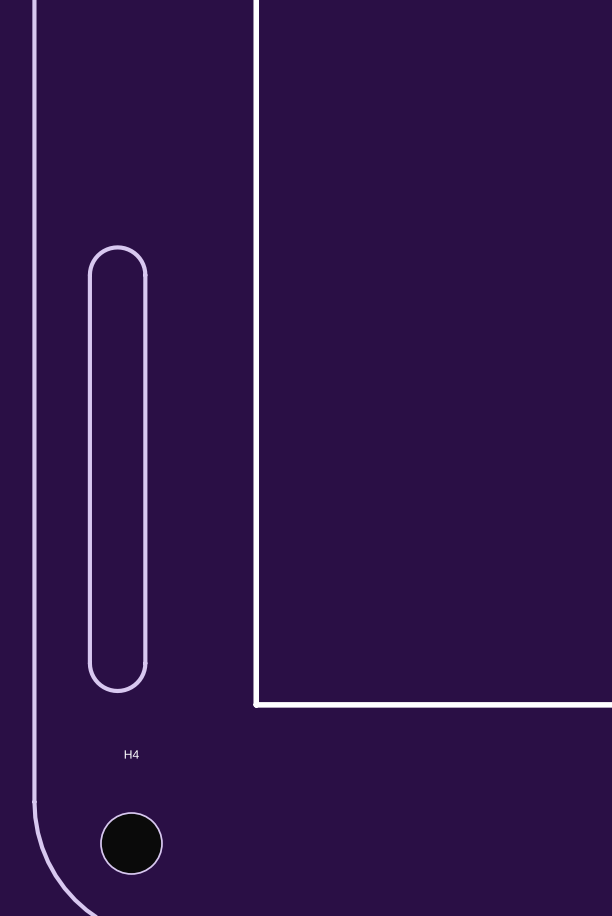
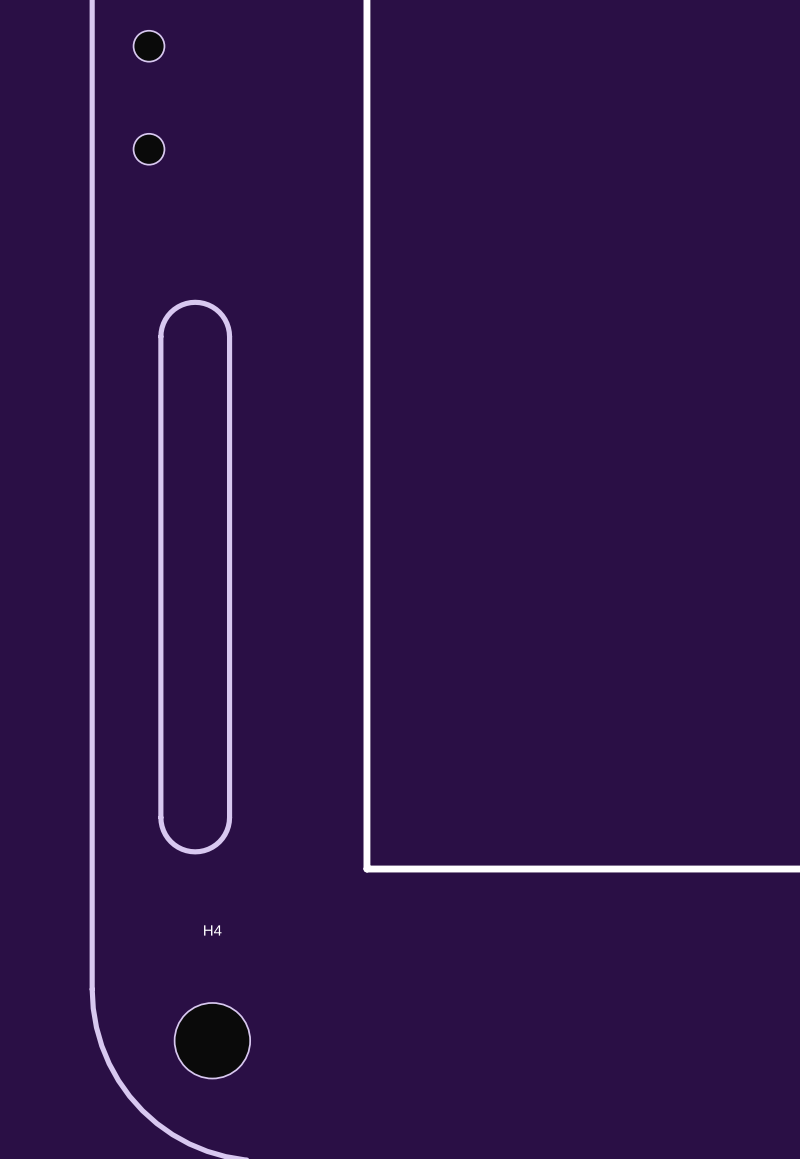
part: none -> (149, 97)

